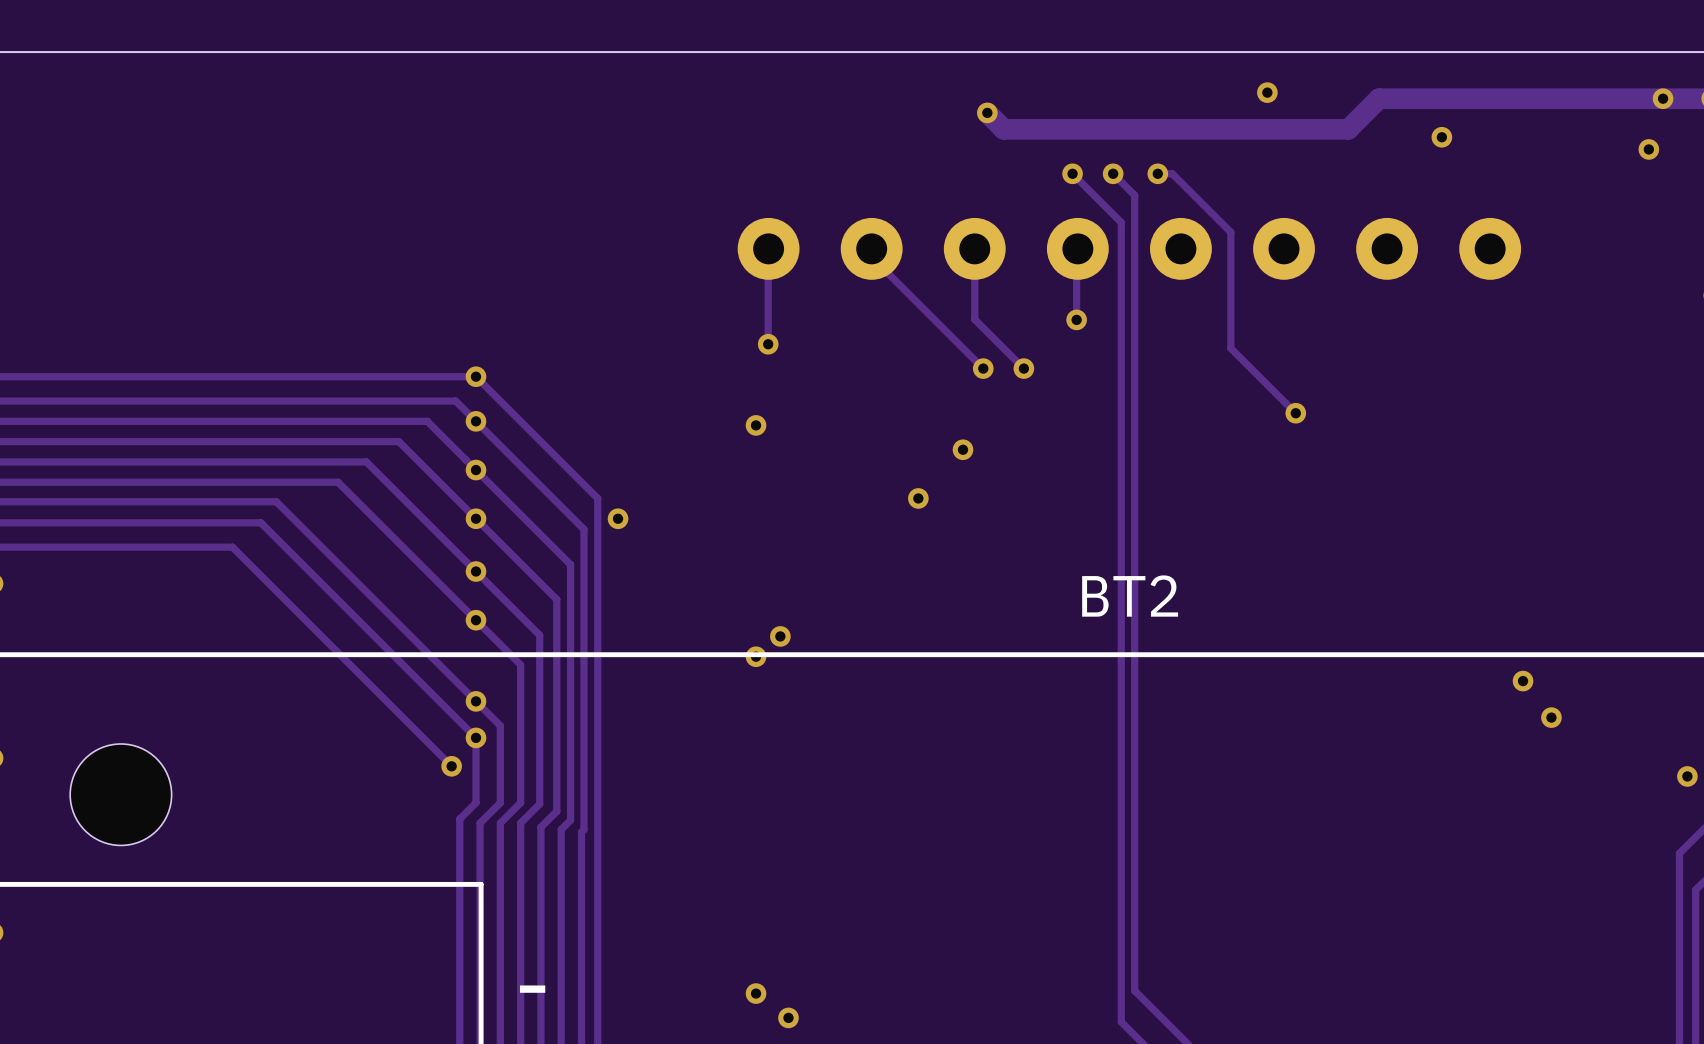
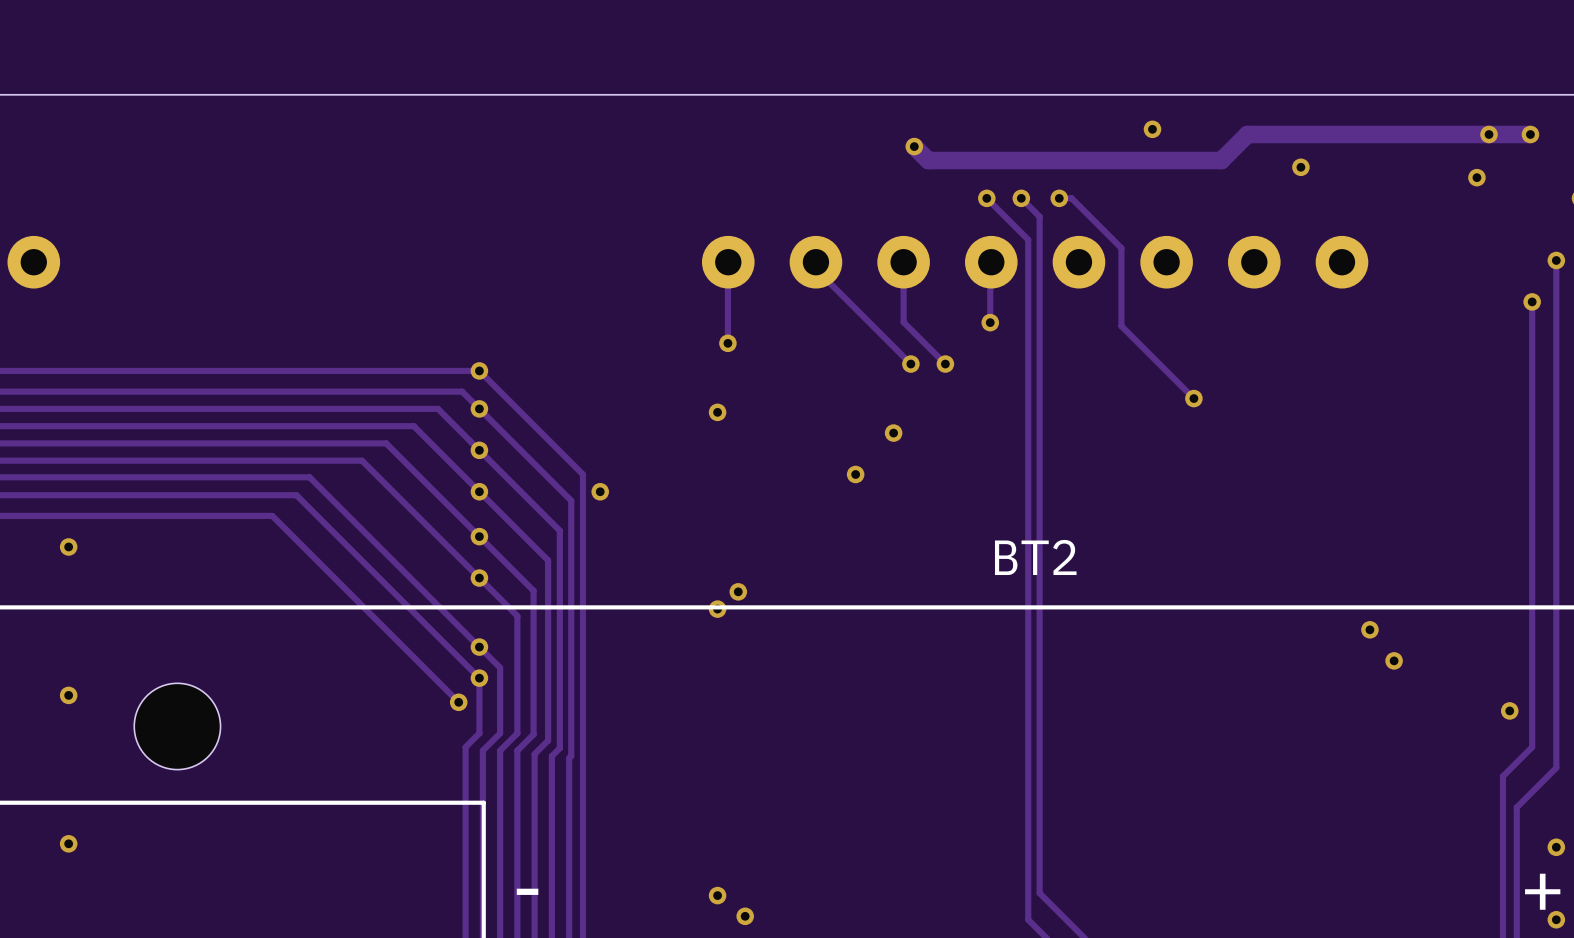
track: (1230, 323) (1230, 348) (1295, 413) -> (1121, 326) (1193, 398)
via position: (1295, 413) -> (1193, 398)

